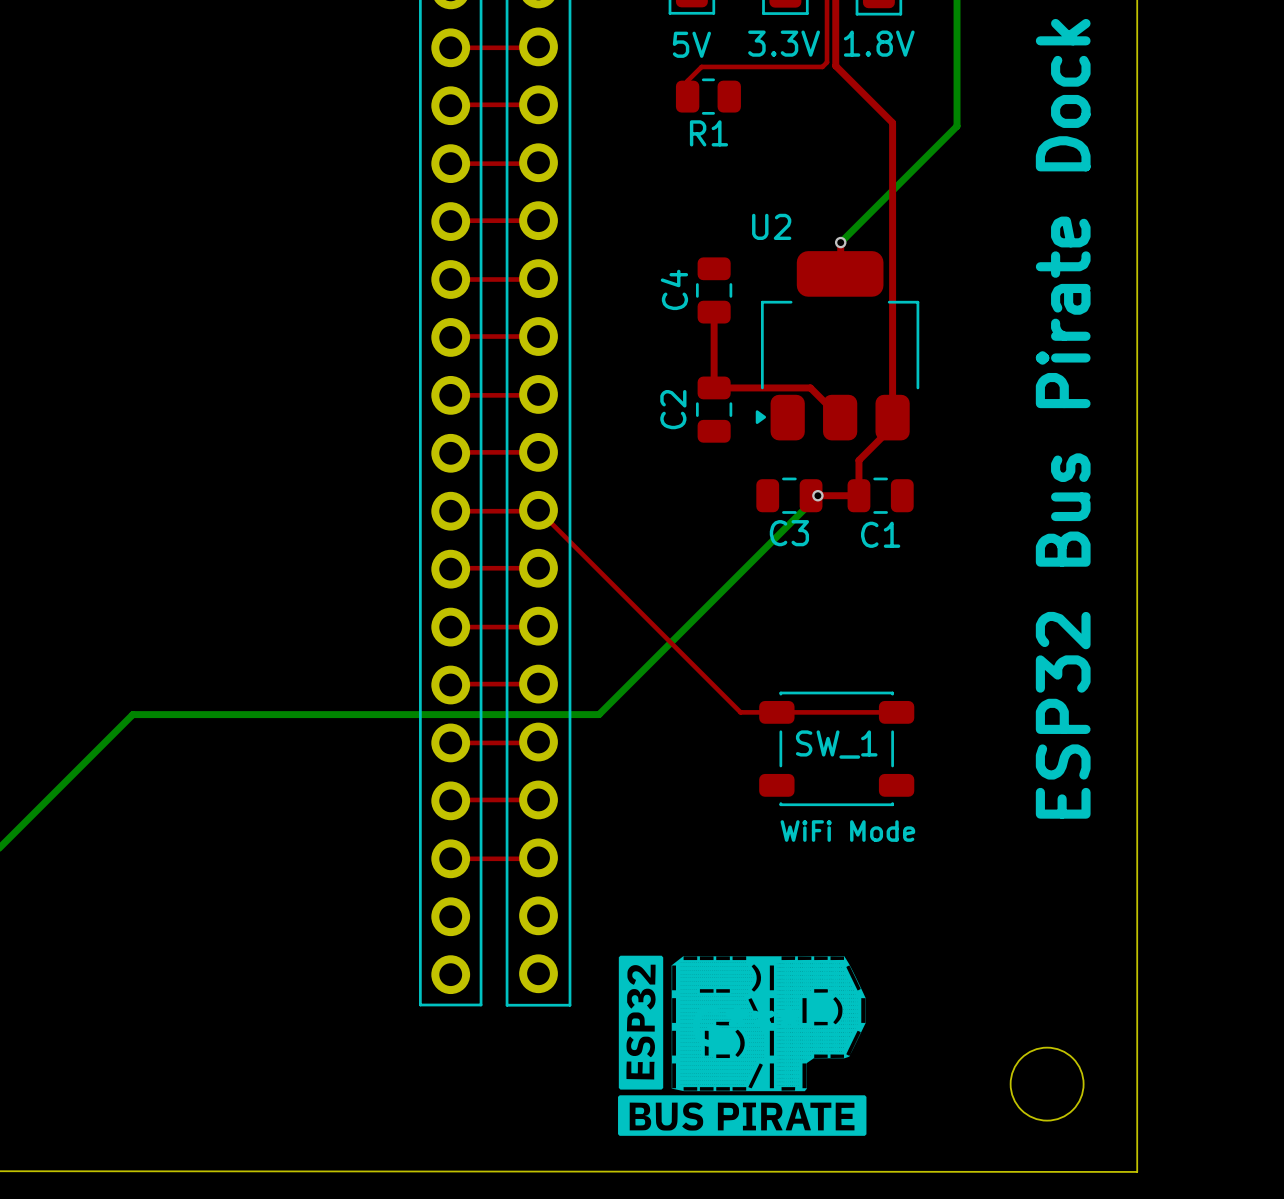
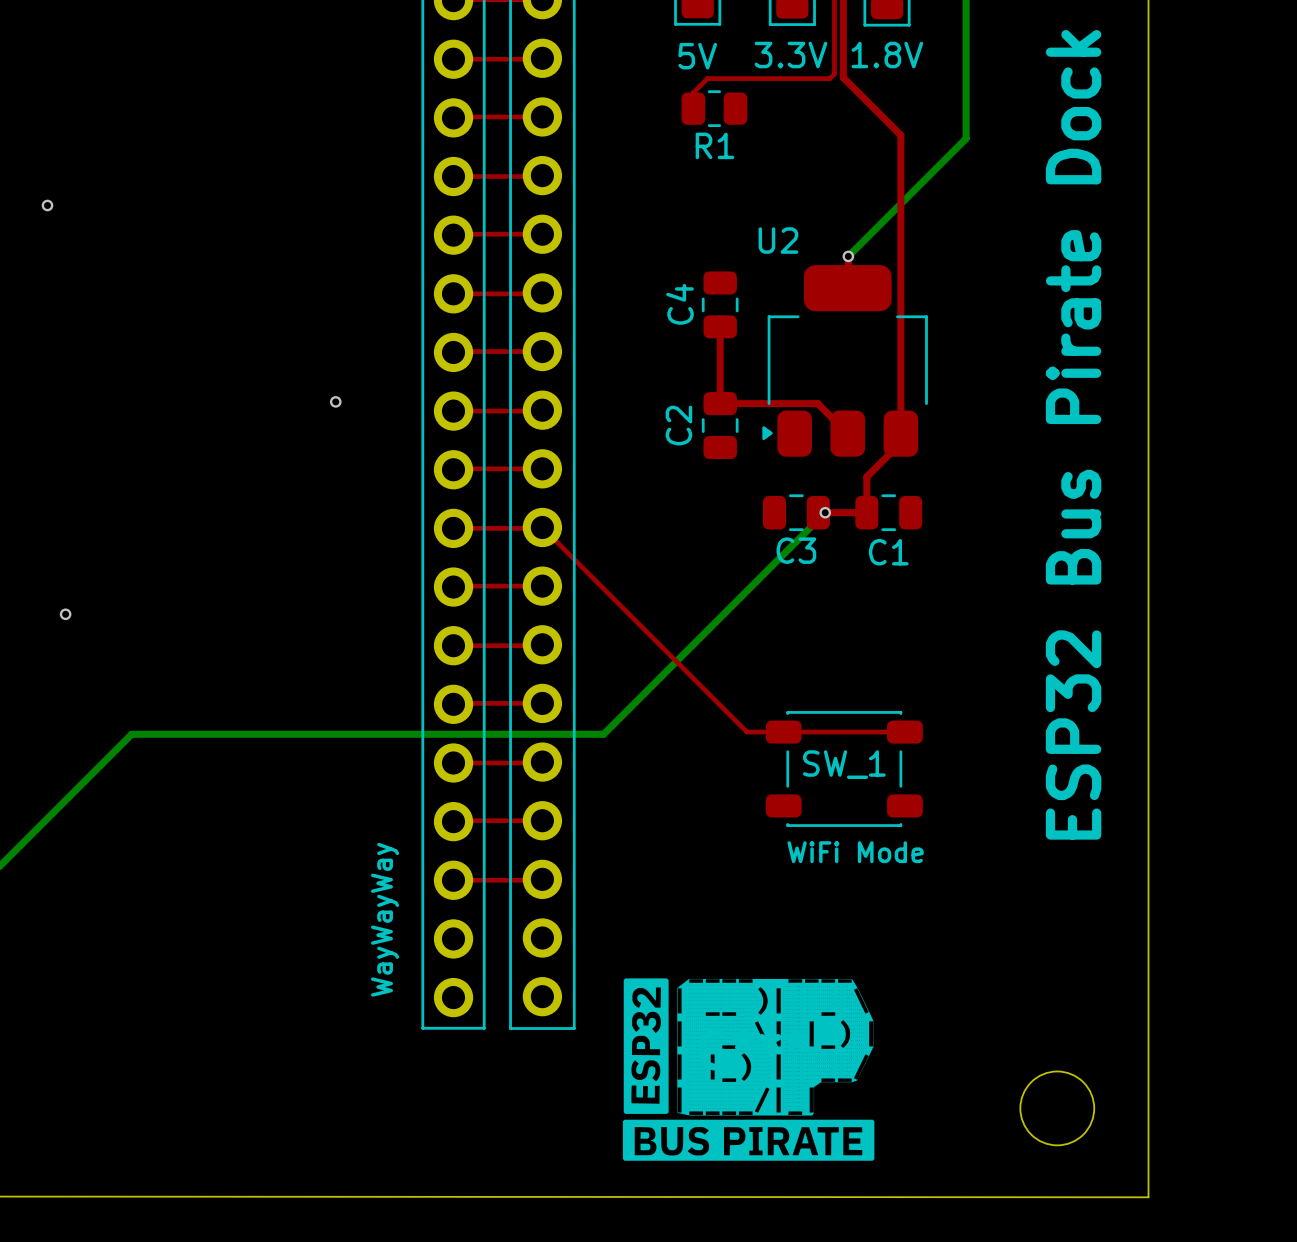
via: none -> (47, 205)
via: none -> (335, 401)
via: none -> (65, 614)
text: none -> WayWayWay (385, 919)

